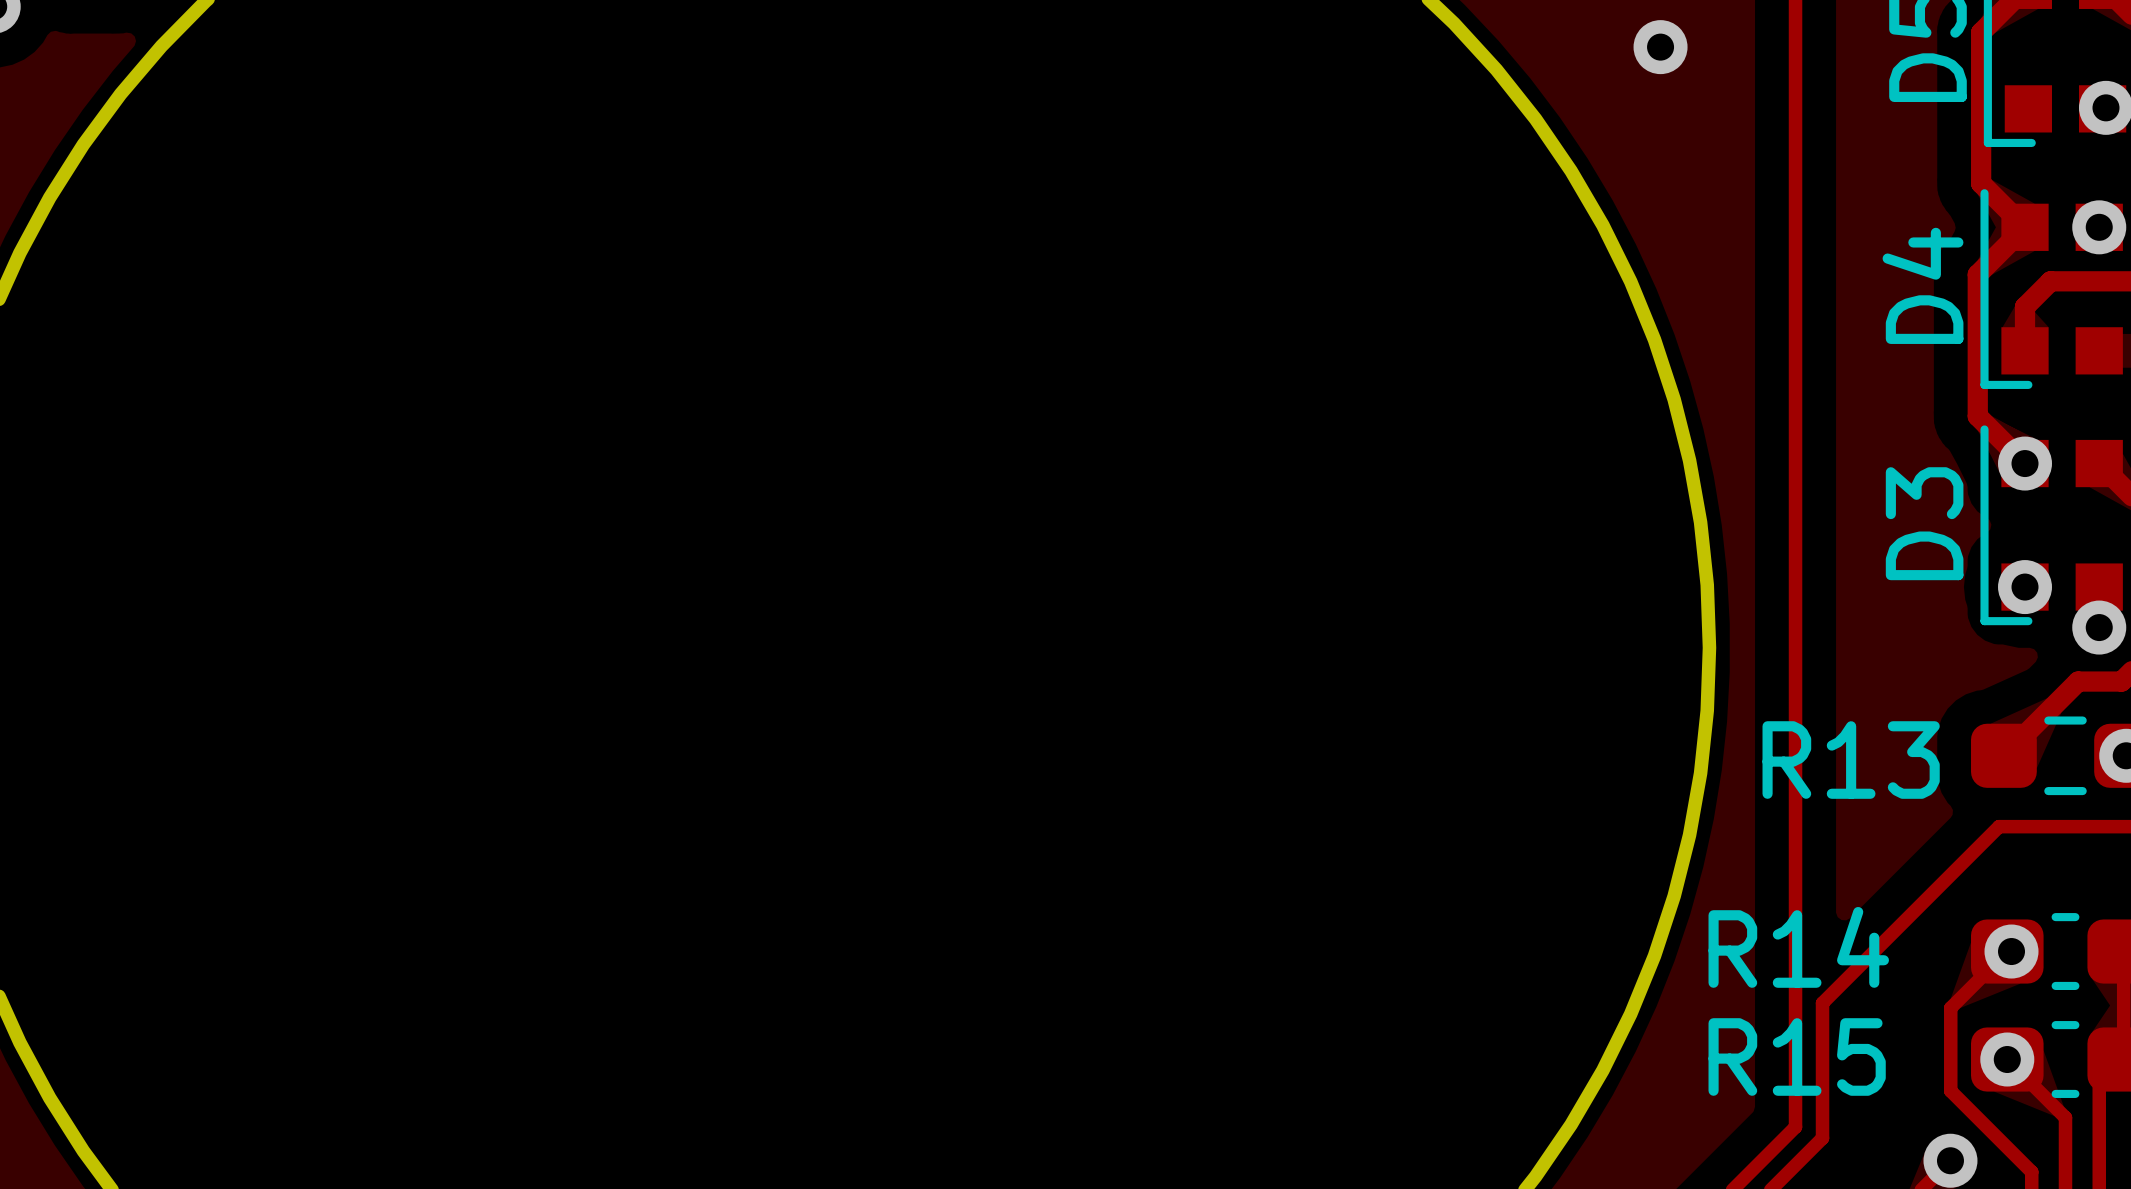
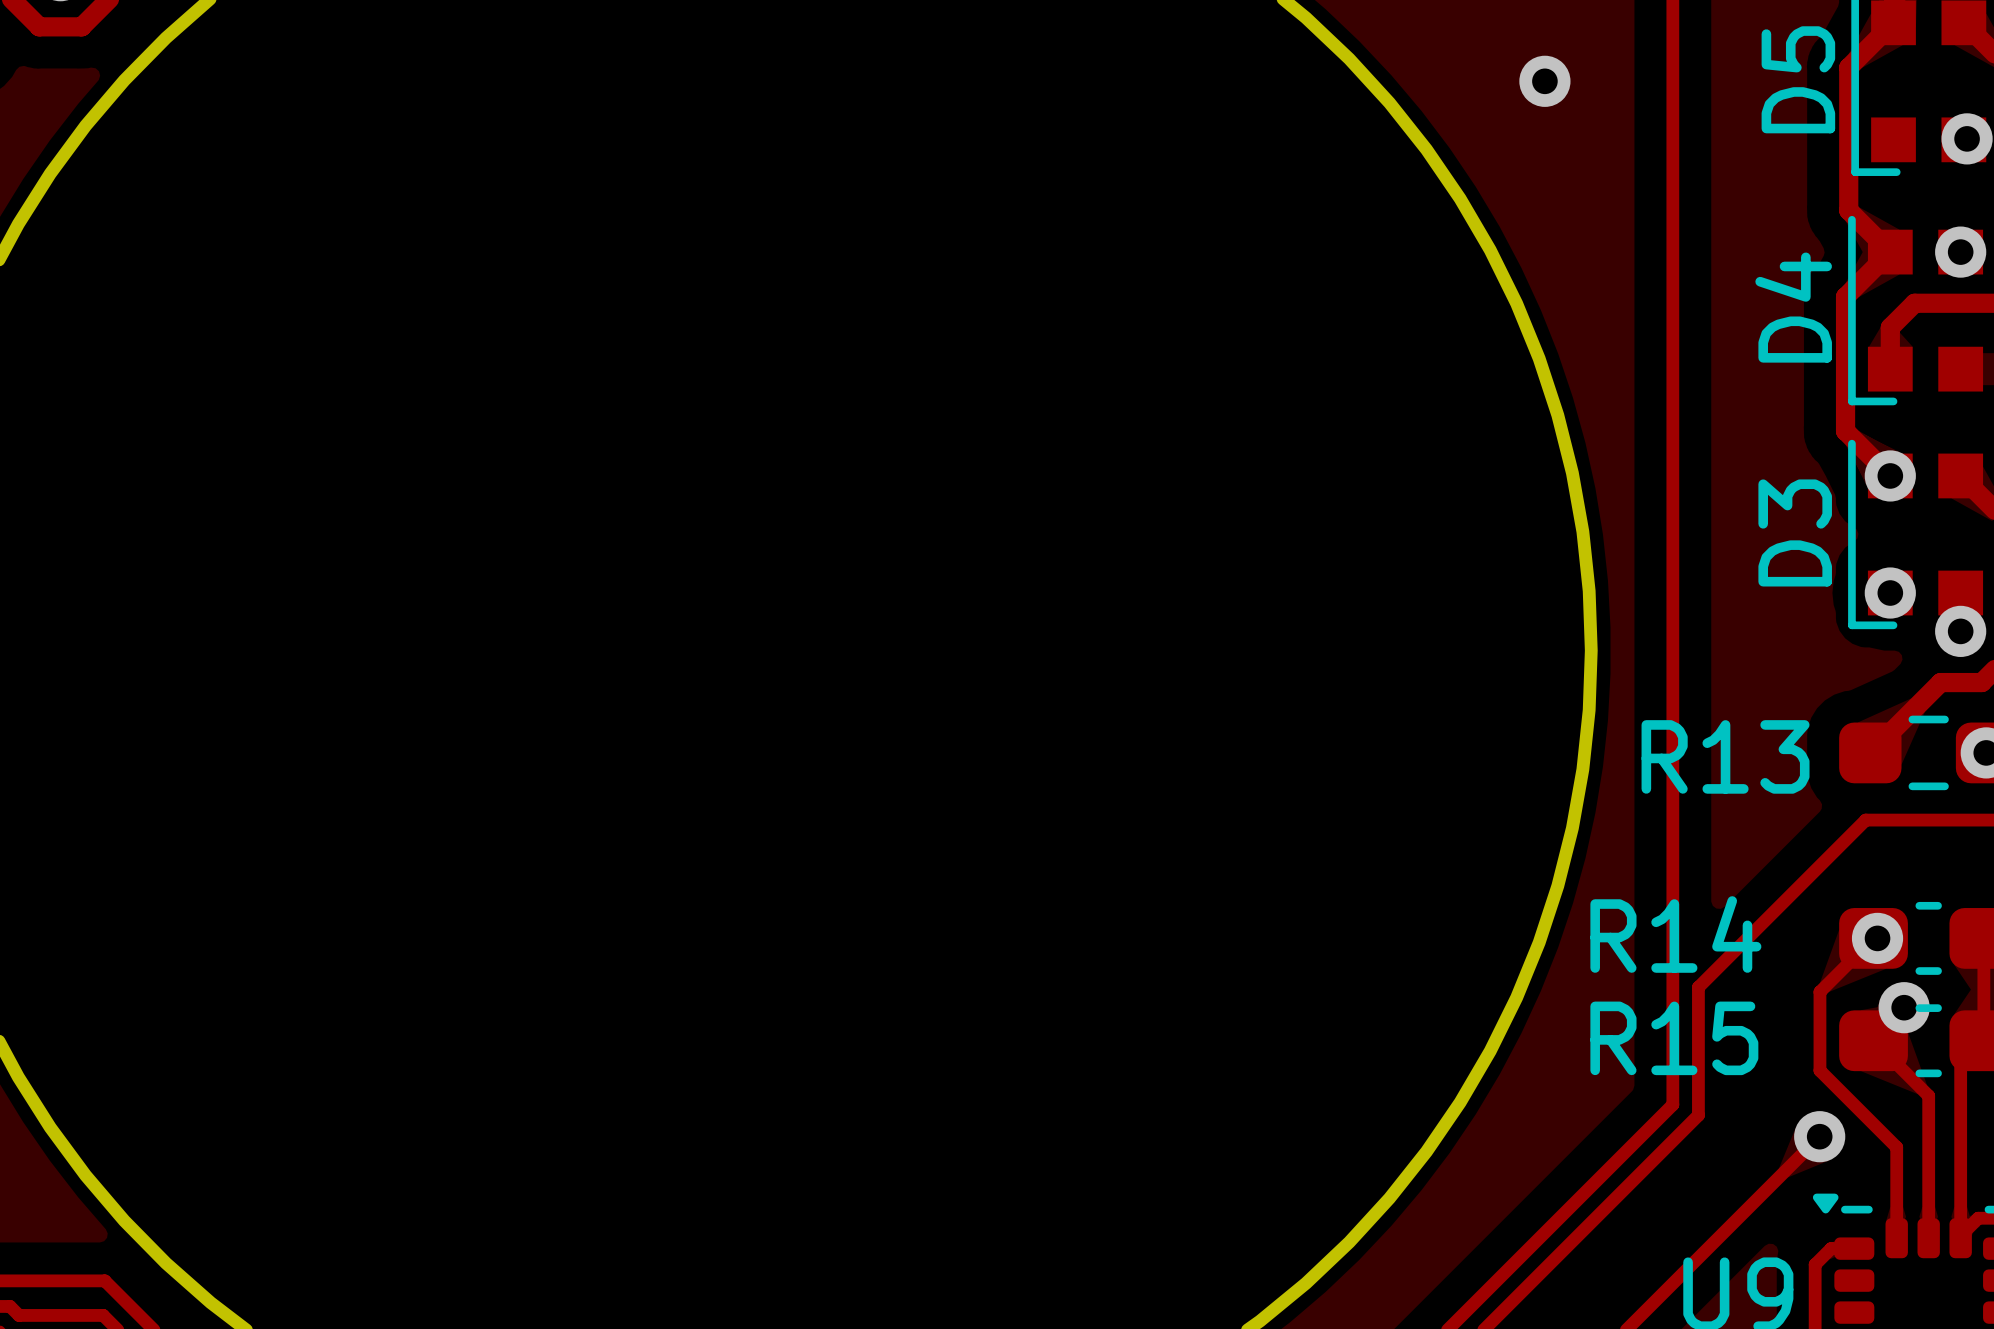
via position: (2007, 1059) -> (1904, 1007)

